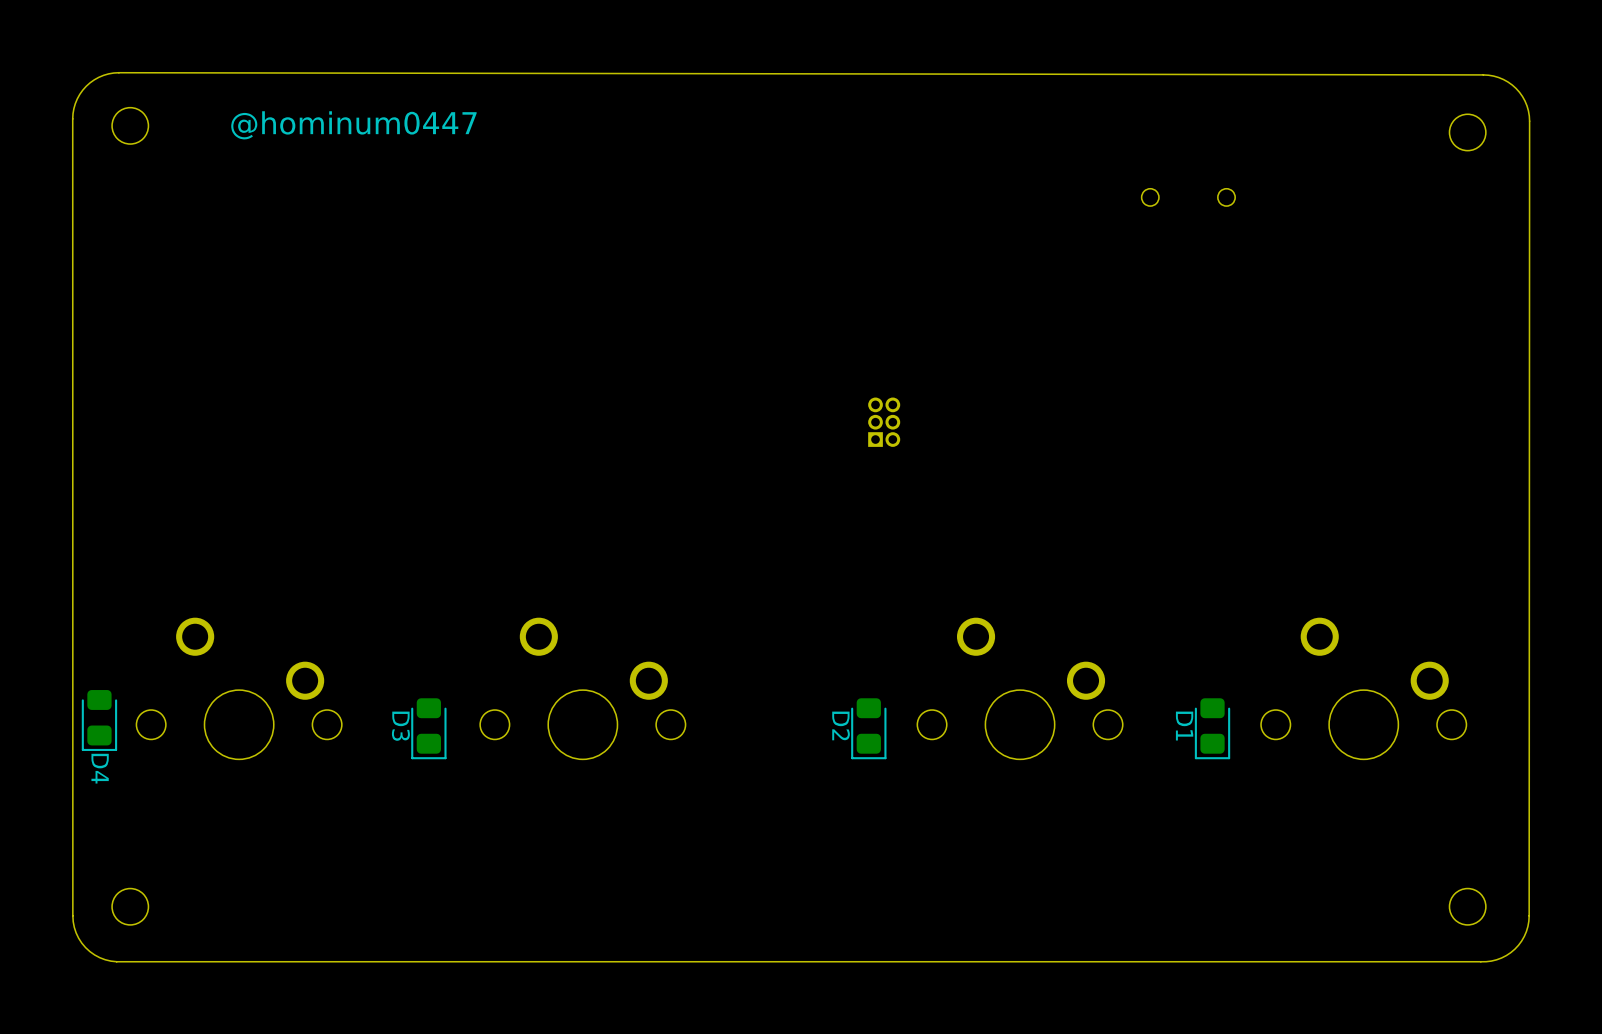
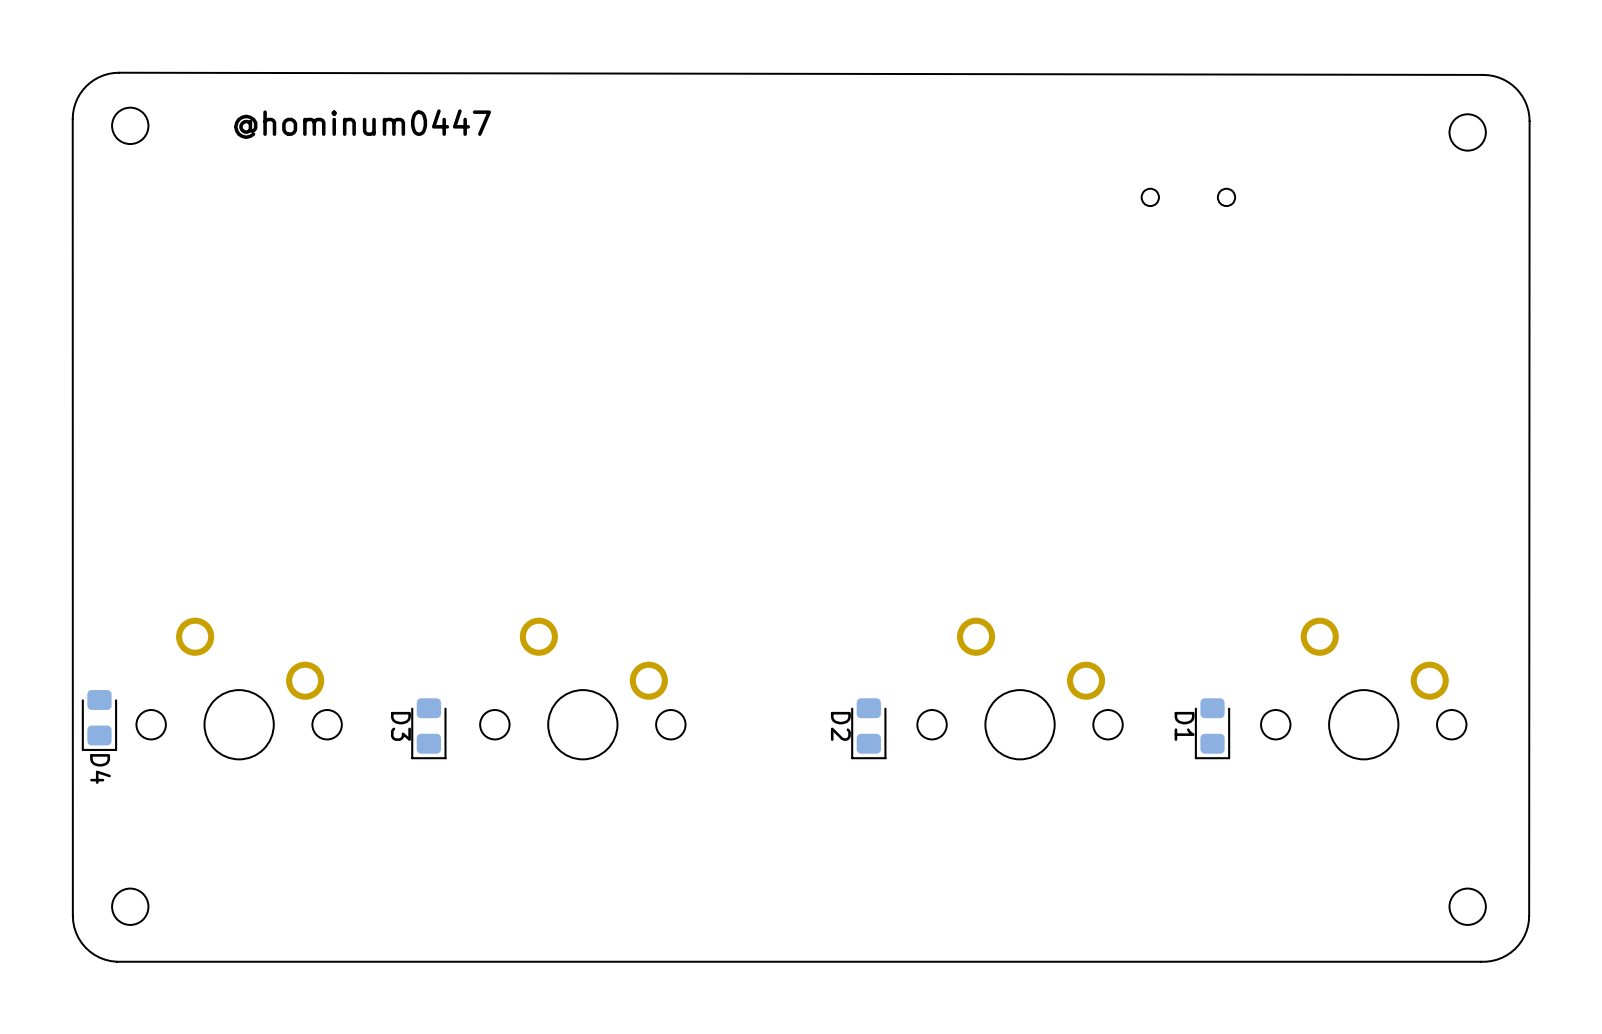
part: (884, 422) -> none

